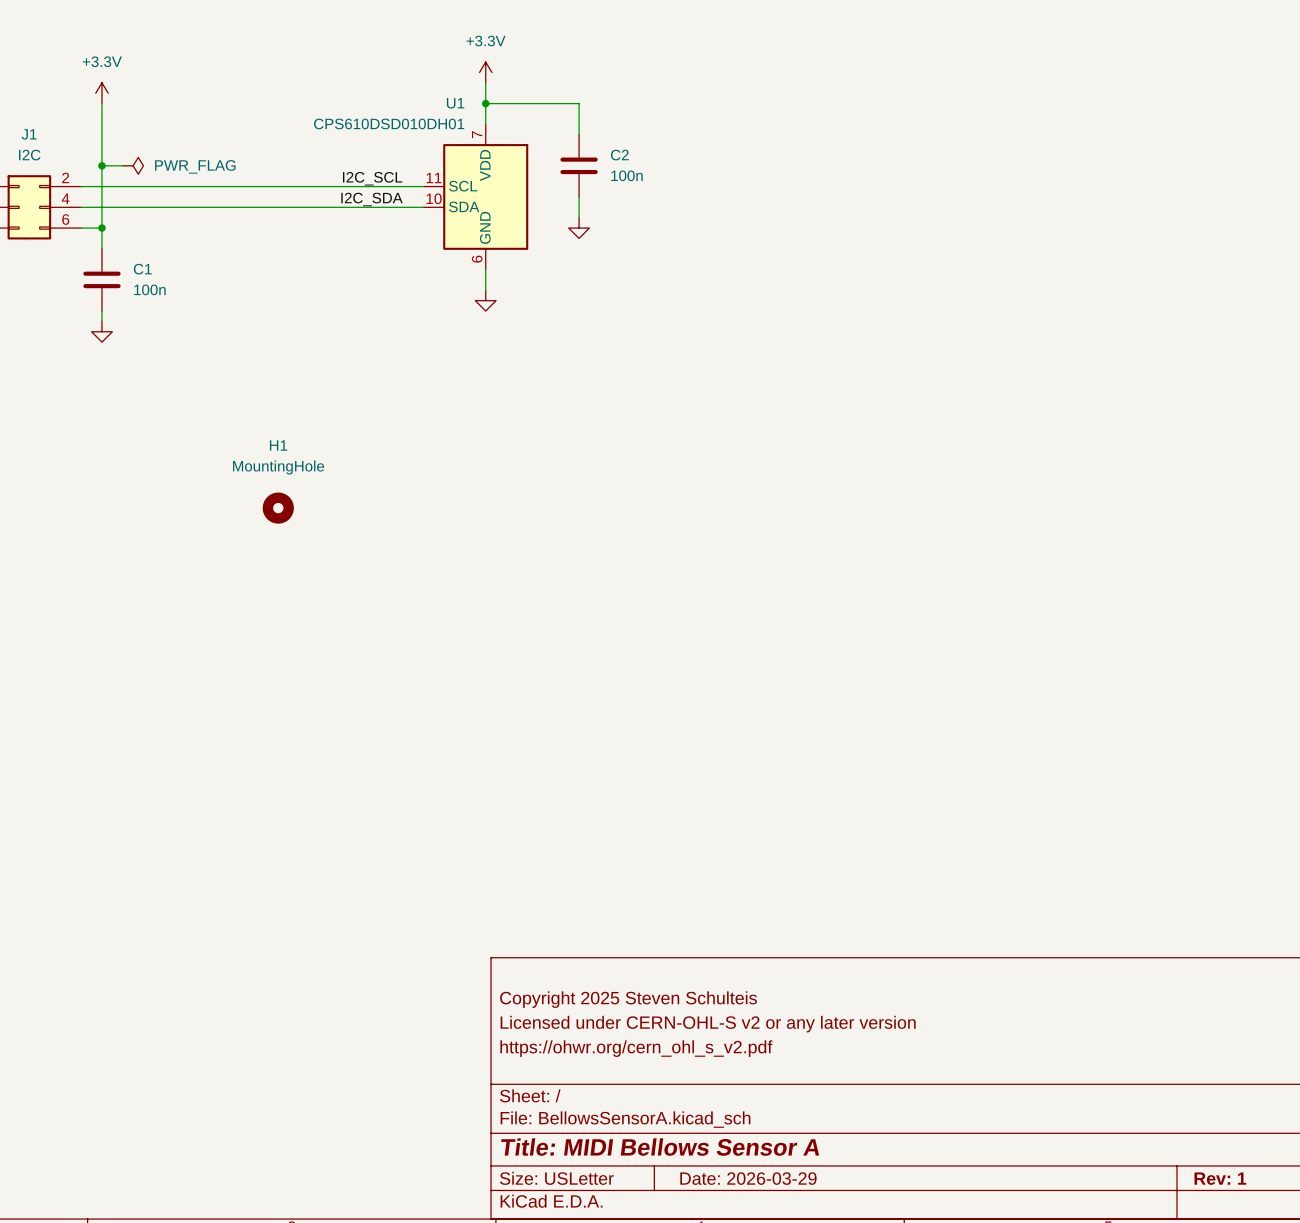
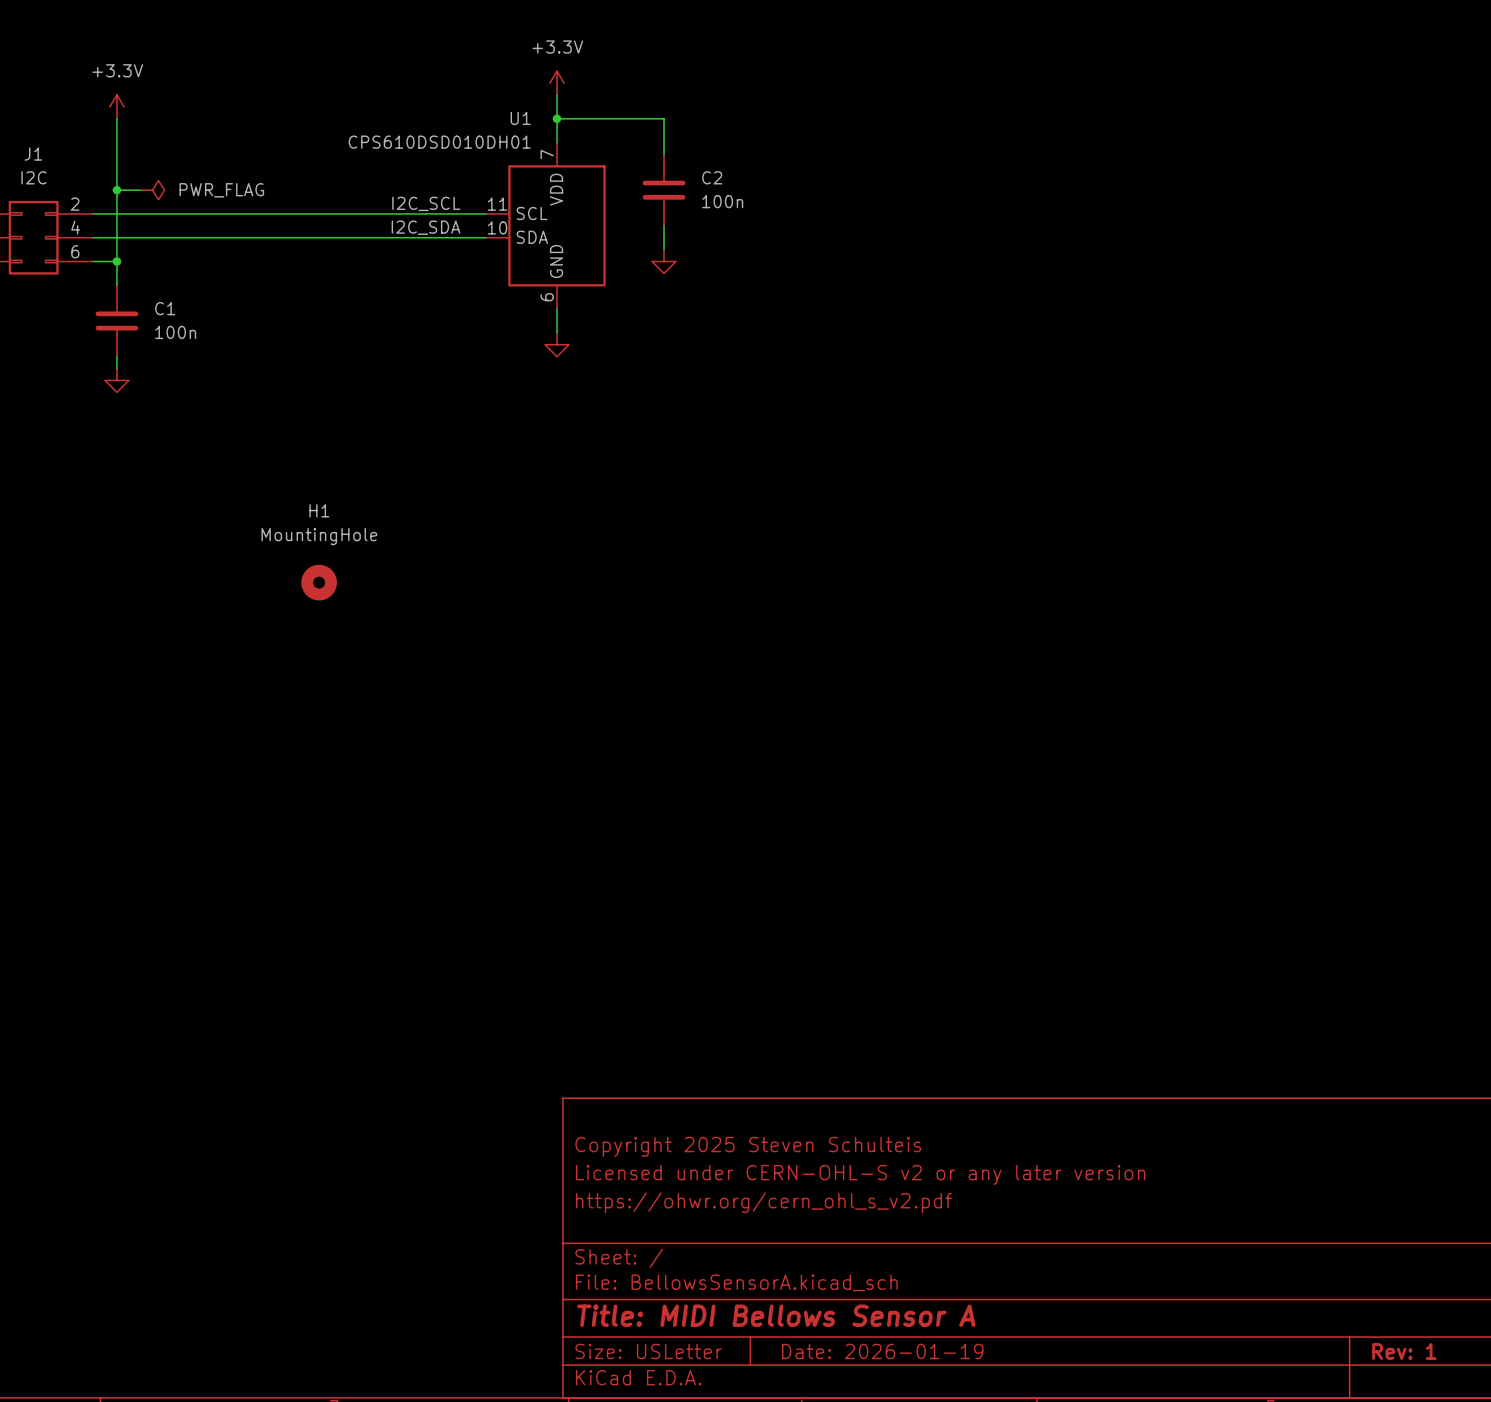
title block: Date: 2026-03-29 (748, 1178) -> Date: 2026-01-19 (882, 1351)

